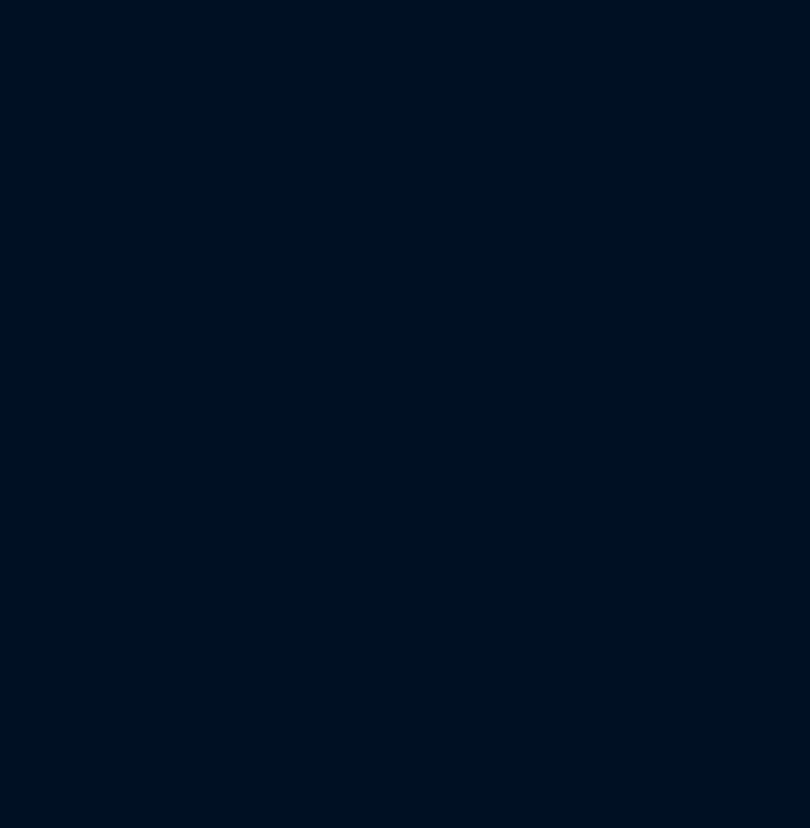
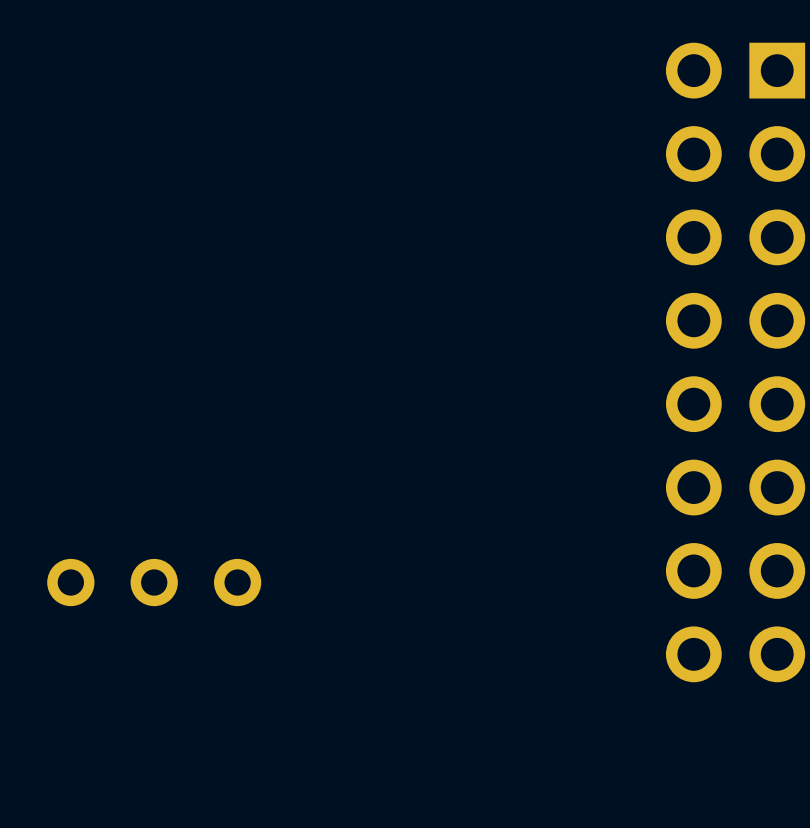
part: none -> (735, 362)
part: none -> (154, 582)

